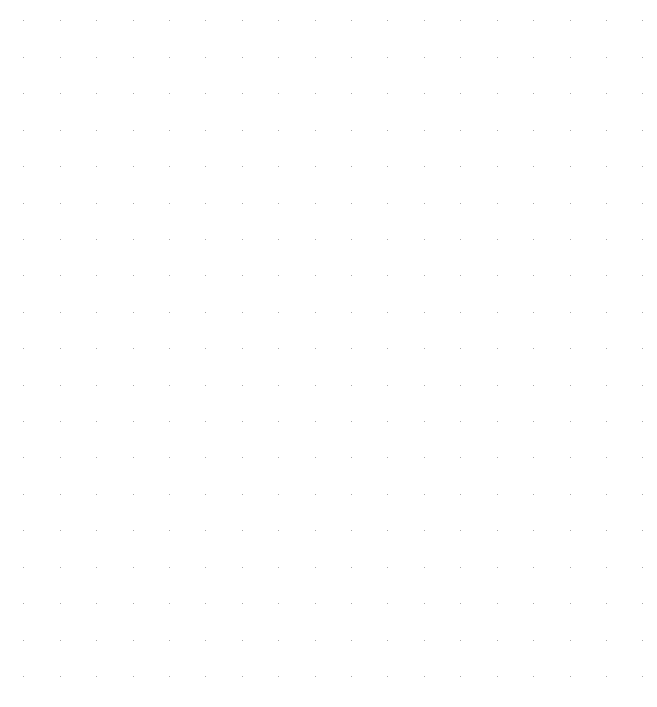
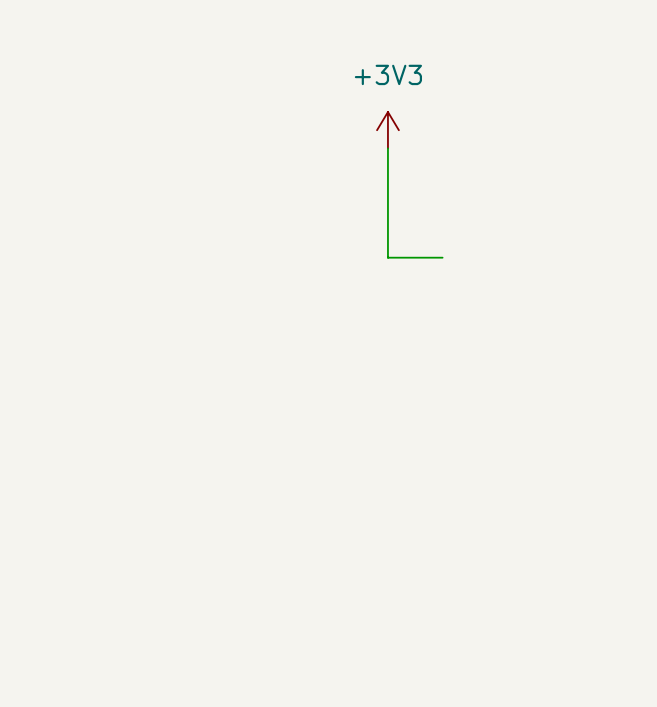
power symbol: none -> +3V3 (387, 130)
wire: none -> (387, 148) (387, 257) (442, 257)

